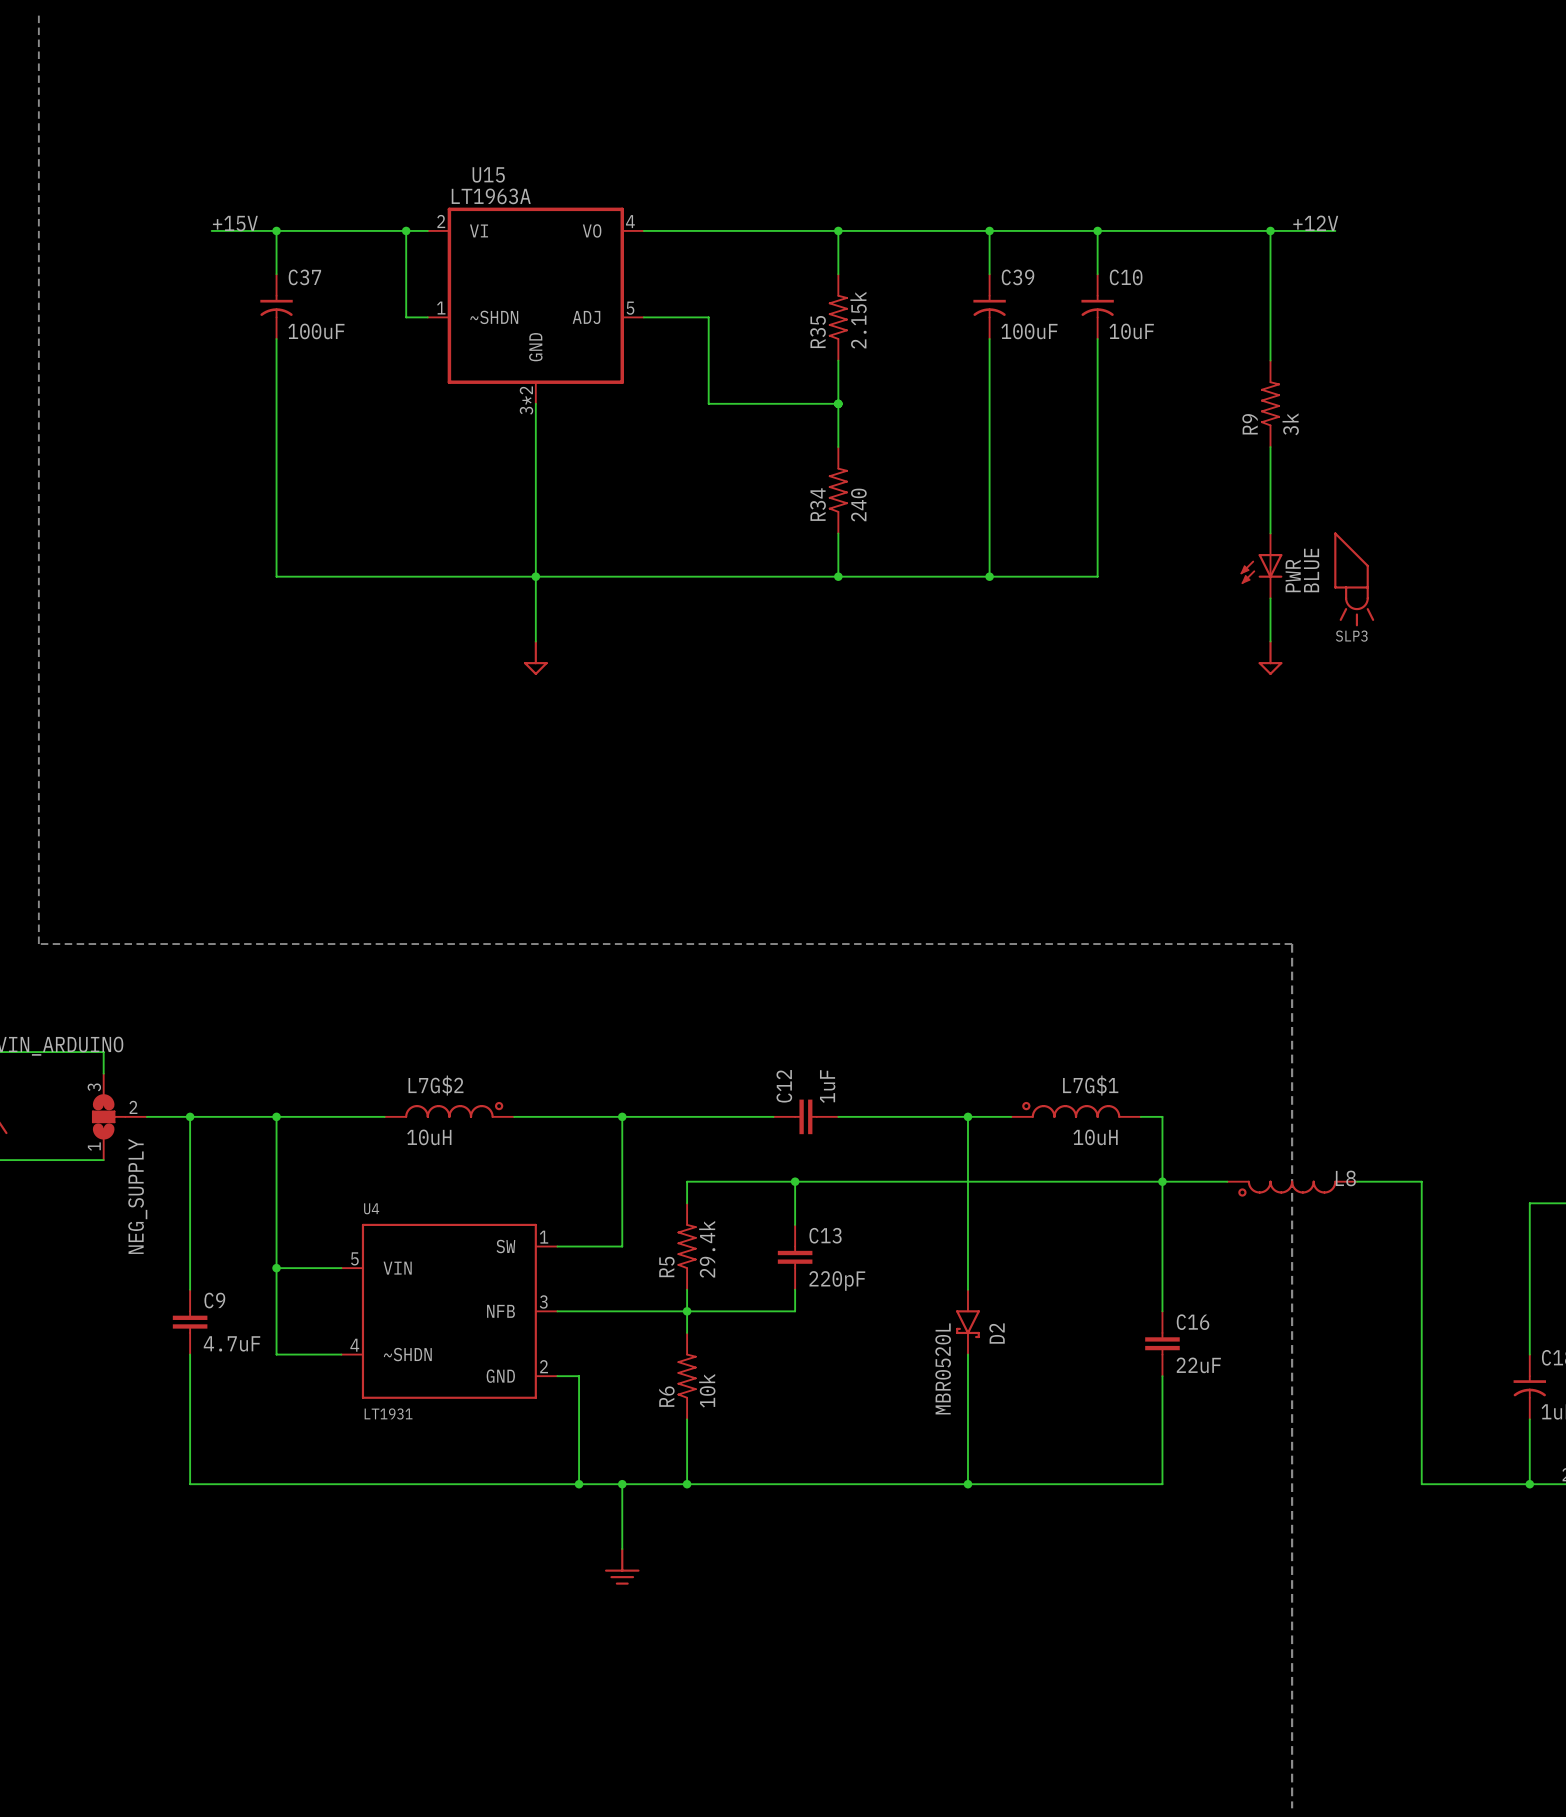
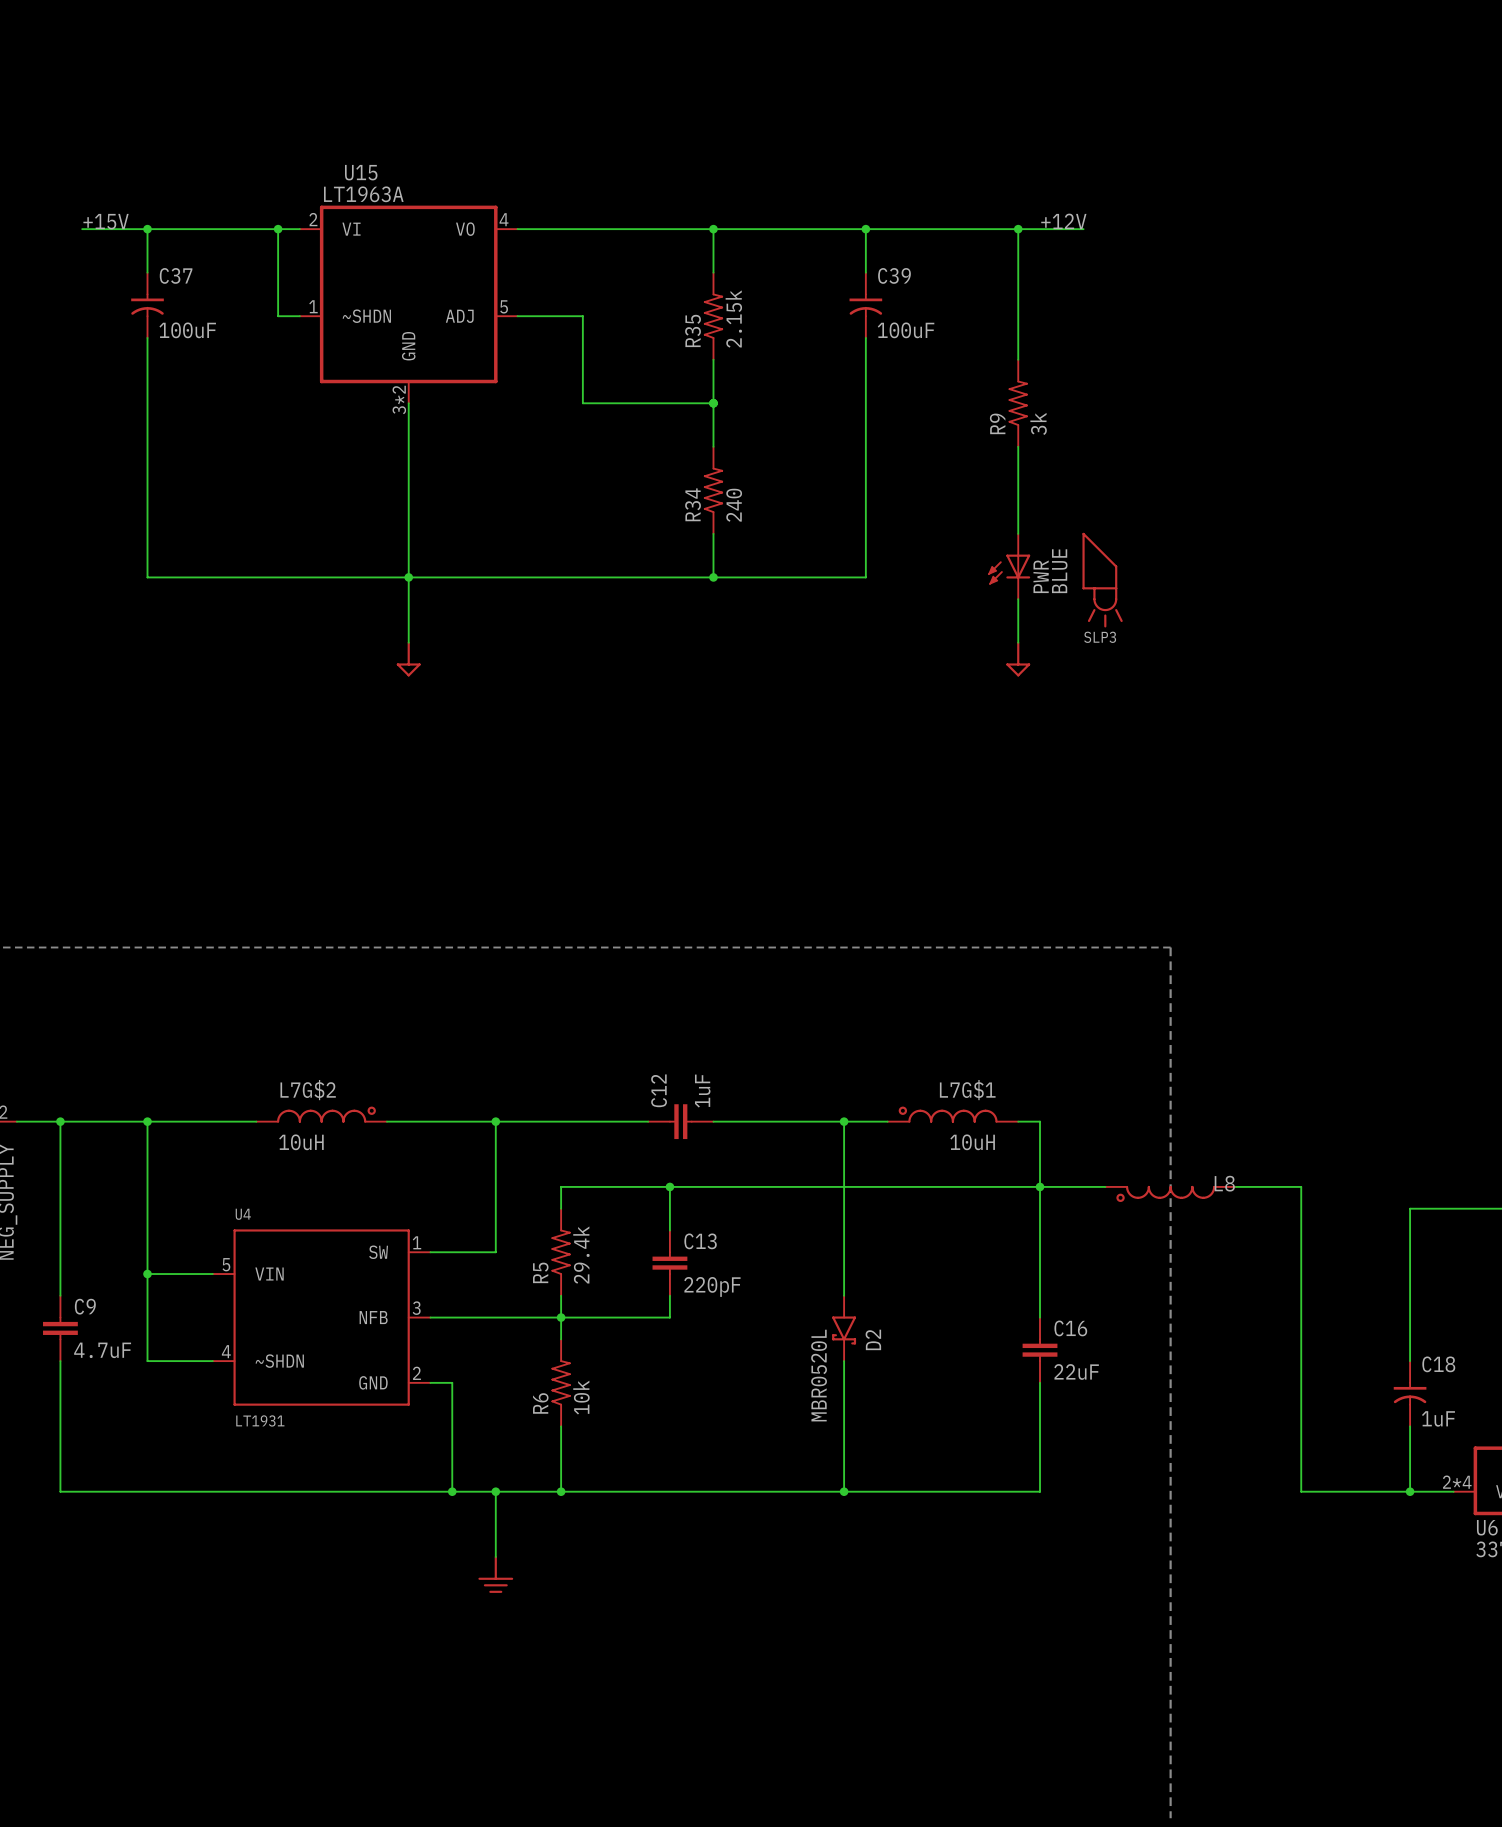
label position: +12V (1315, 223) -> +12V (1063, 221)
wire: (1097, 230) (1097, 274) -> none
junction position: (1097, 230) -> (1018, 229)
wire: (1205, 230) (1335, 230) -> none
wire: (1270, 230) (1270, 360) -> (1018, 229) (1018, 359)
junction: (1270, 230) -> none
C10: 10uF (1097, 306) -> none
wire: (1097, 339) (1097, 576) (989, 576) -> none
R9 position: (1270, 403) -> (1018, 403)
wire: (1270, 447) (1270, 533) -> (1018, 446) (1018, 533)
PWR position: (1261, 565) -> (1009, 566)
junction: (989, 576) -> none
part position: (1354, 579) -> (1102, 580)
wire: (1270, 598) (1270, 641) -> (1018, 599) (1018, 642)
part position: (1270, 657) -> (1018, 659)

